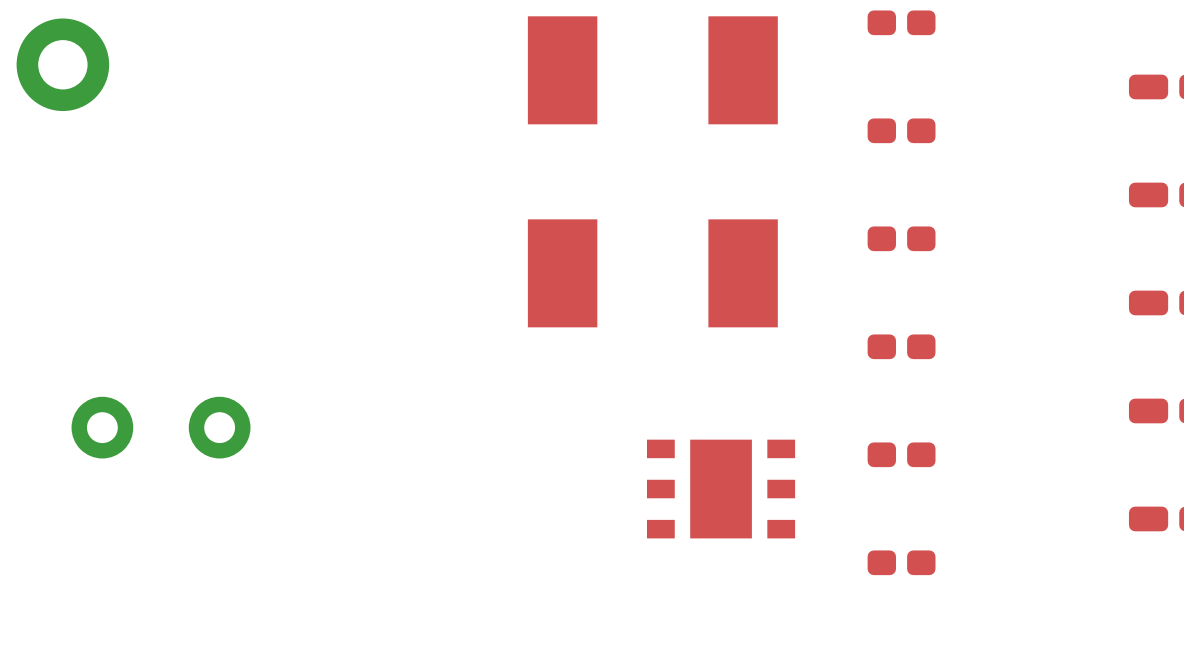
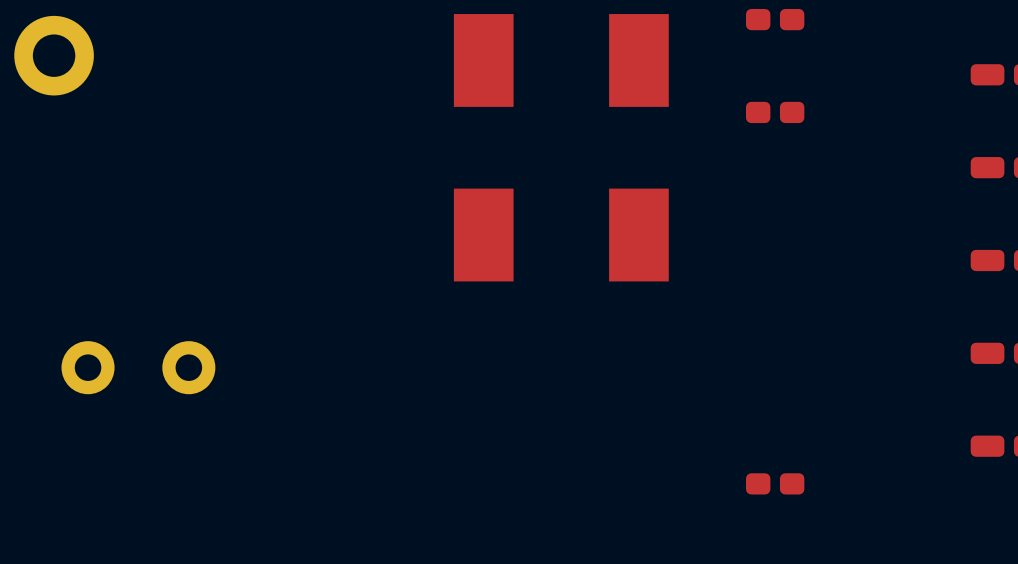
part: (901, 238) -> none
part: (901, 346) -> none
part: (901, 454) -> none
part: (721, 489) -> none

